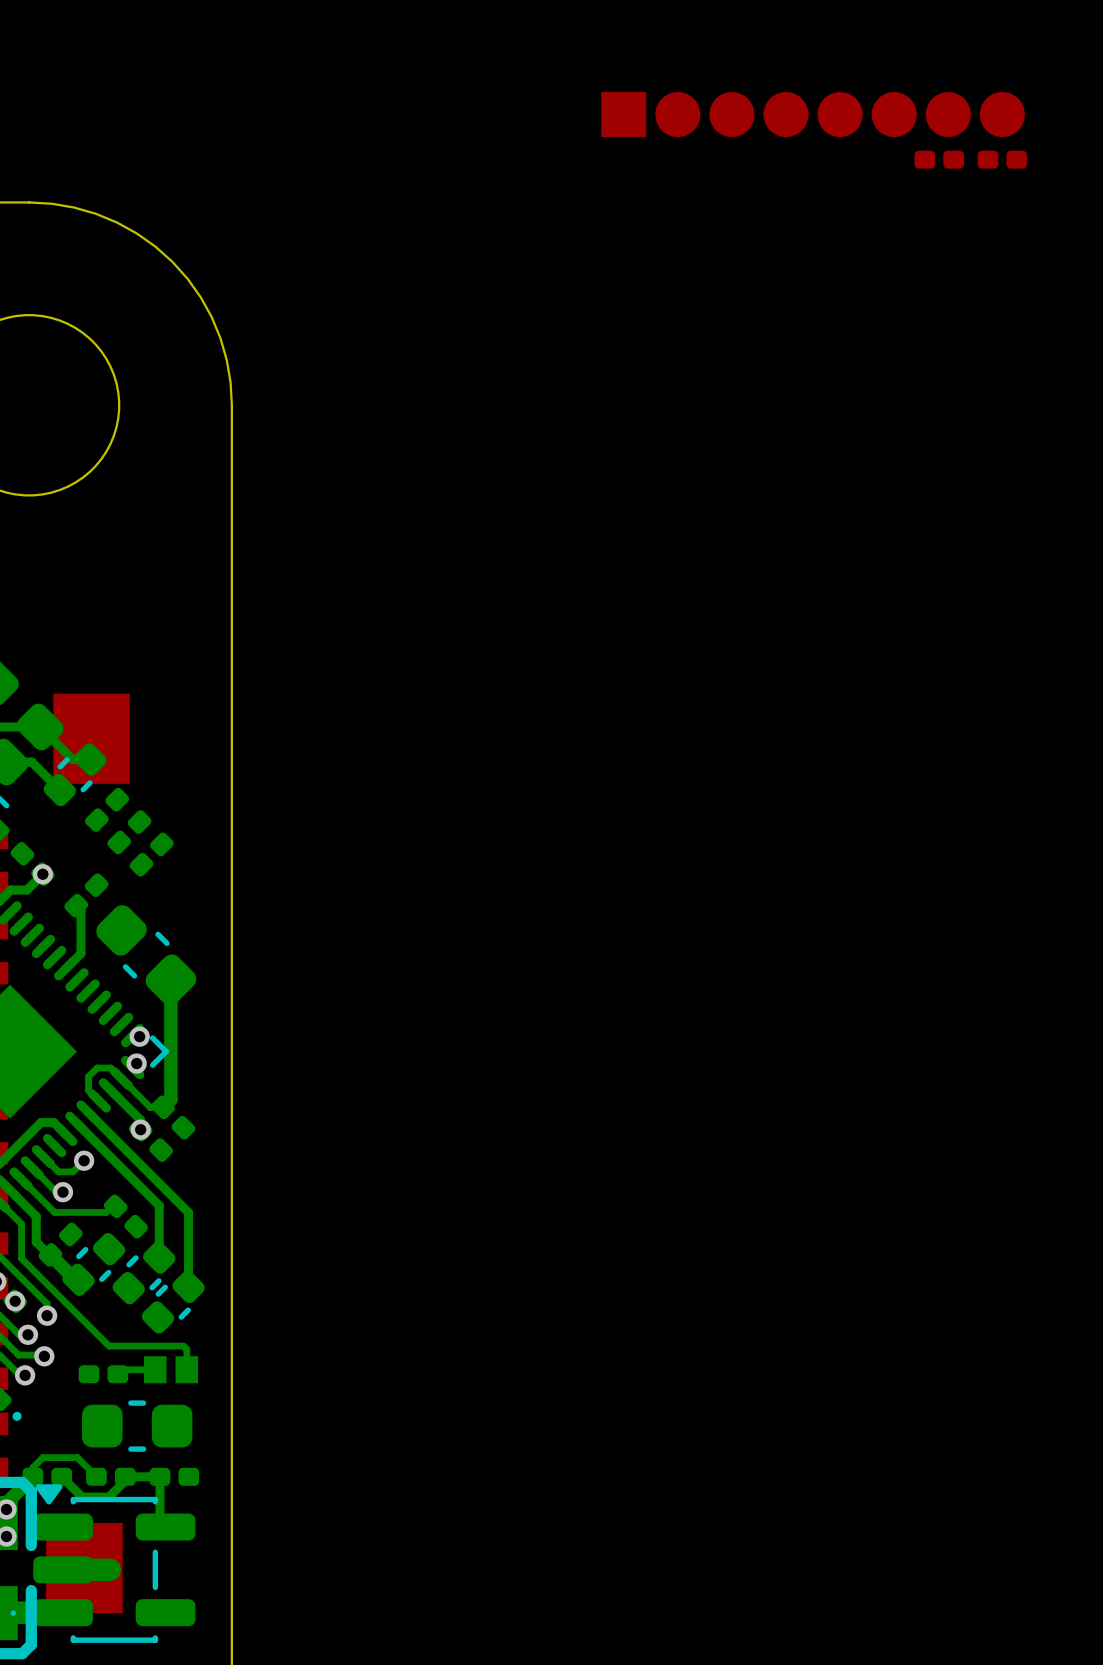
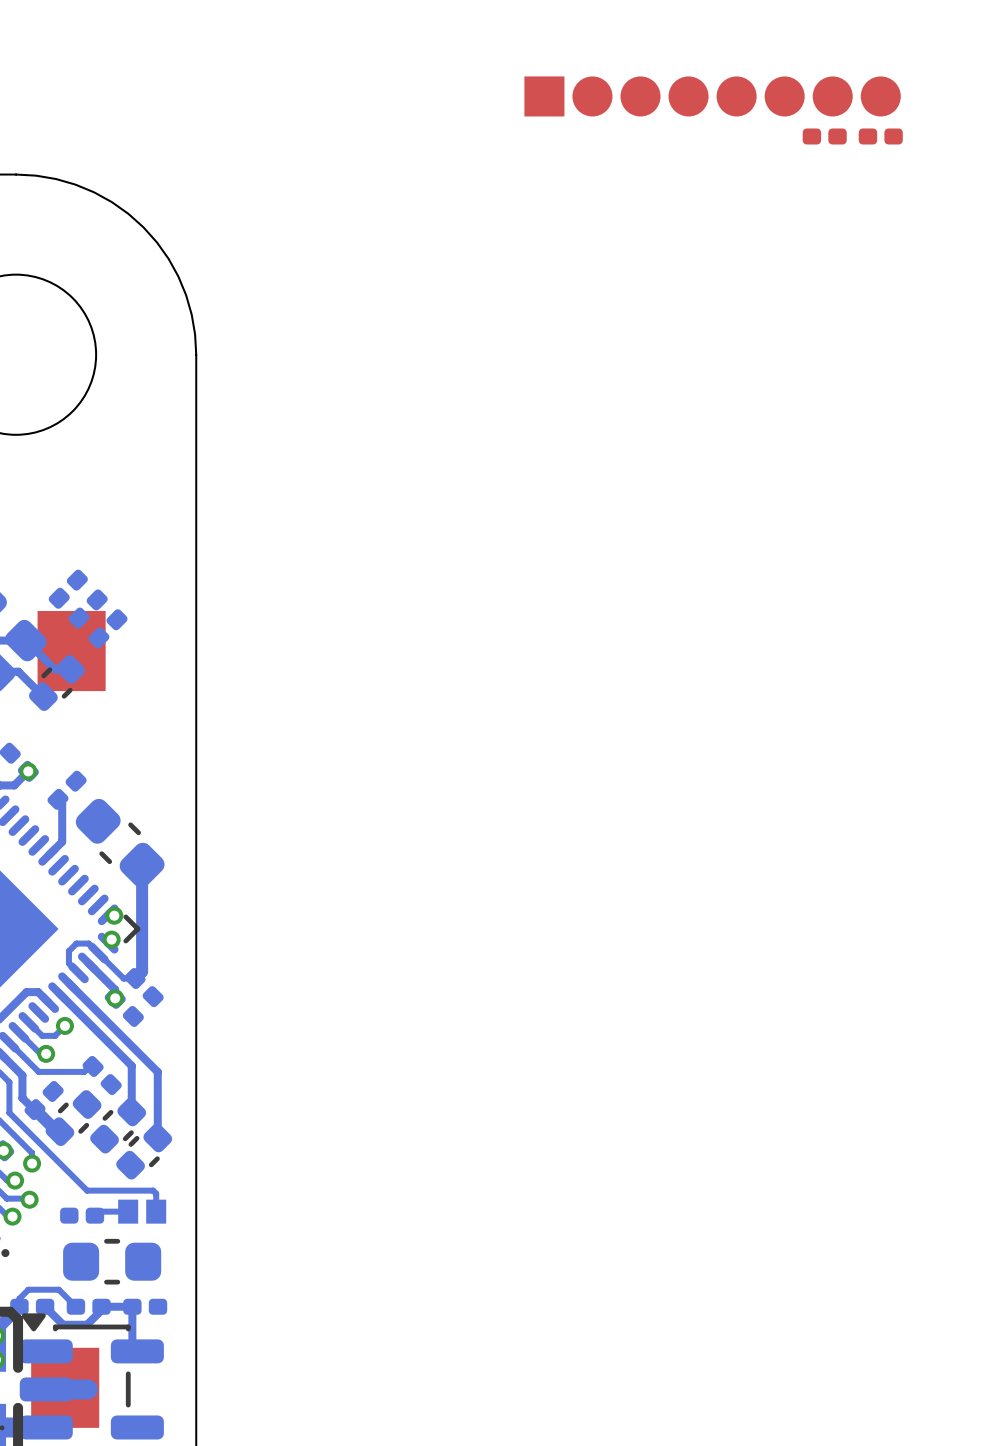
part: none -> (68, 589)
part: none -> (88, 609)
part: none -> (107, 628)
part: (107, 809) -> none
part: (129, 832) -> none
part: (151, 854) -> none

